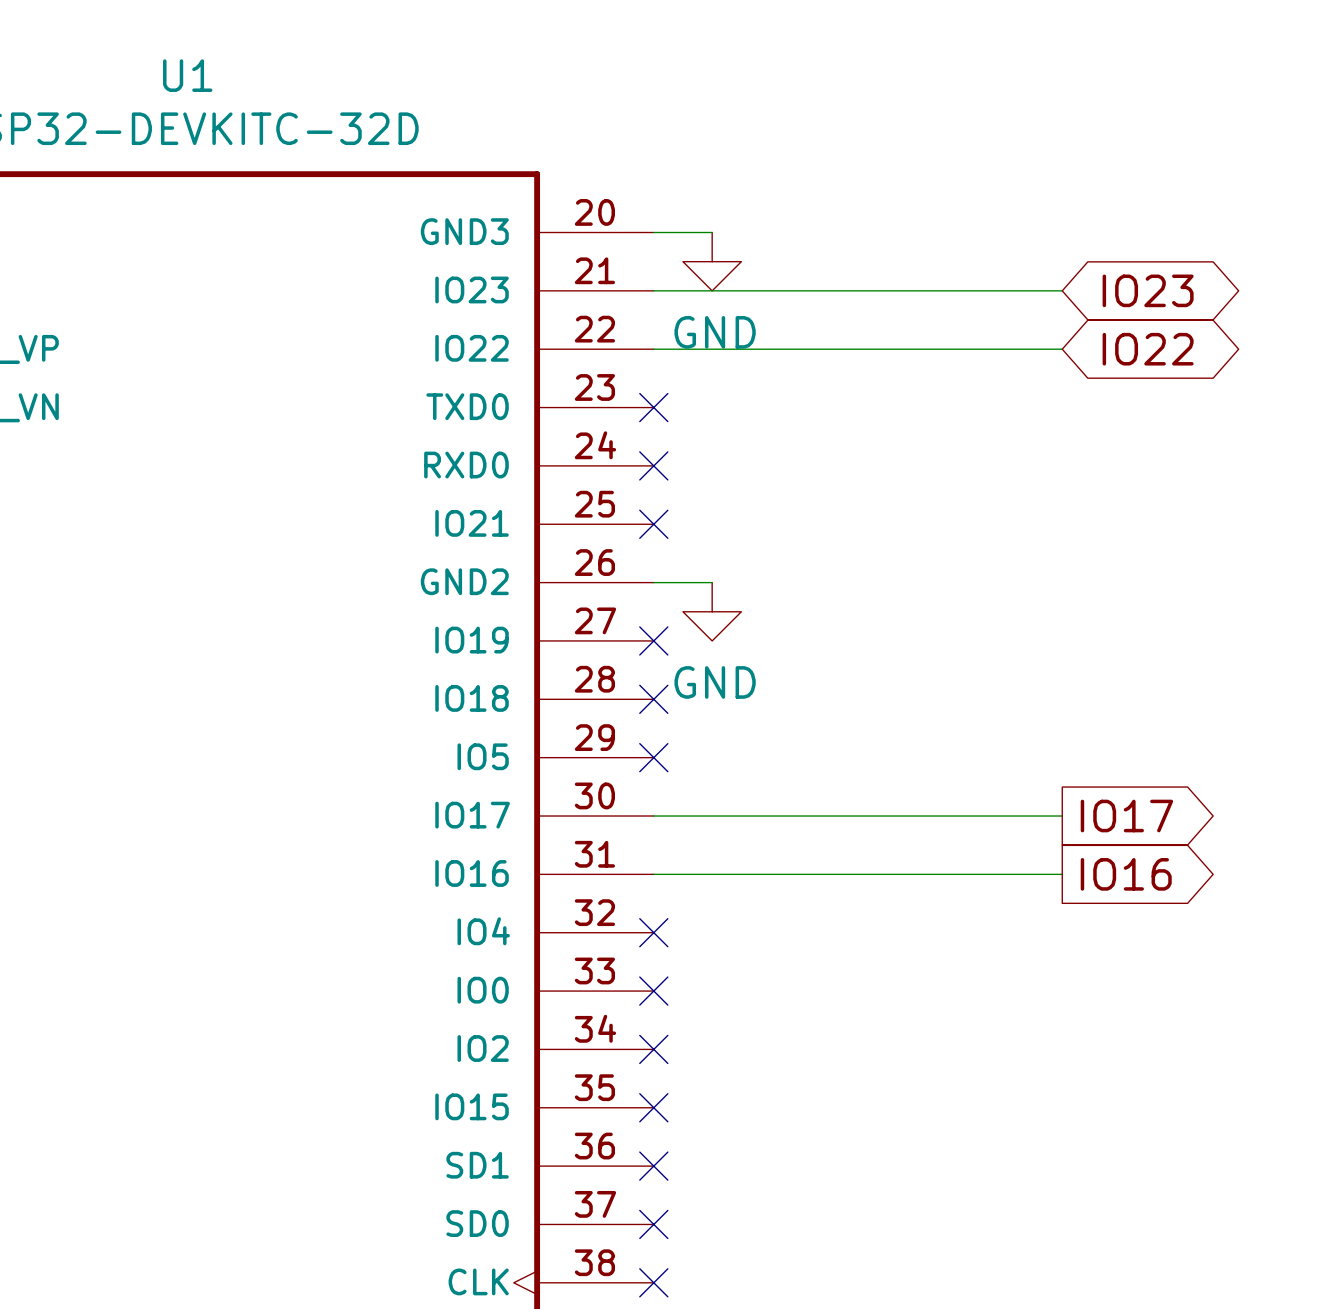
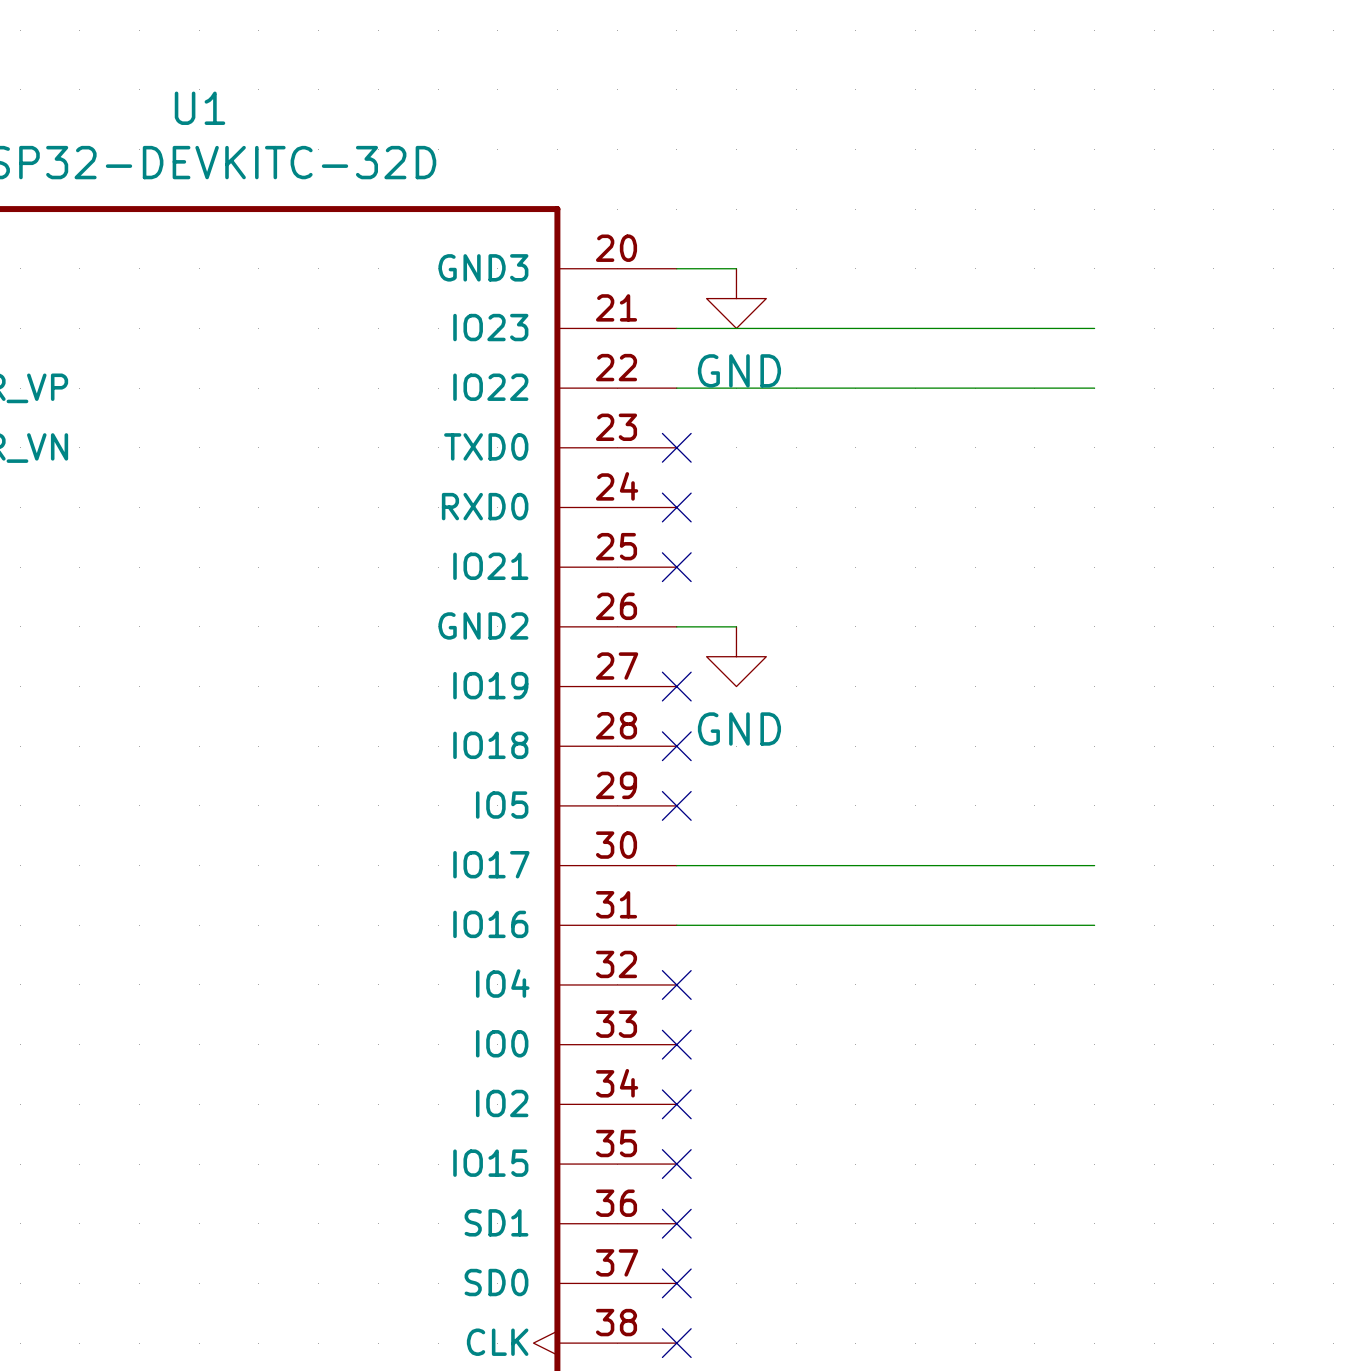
global label: IO23 (1148, 290) -> none
global label: IO22 (1148, 349) -> none
global label: IO17 (1126, 816) -> none
global label: IO16 (1126, 874) -> none

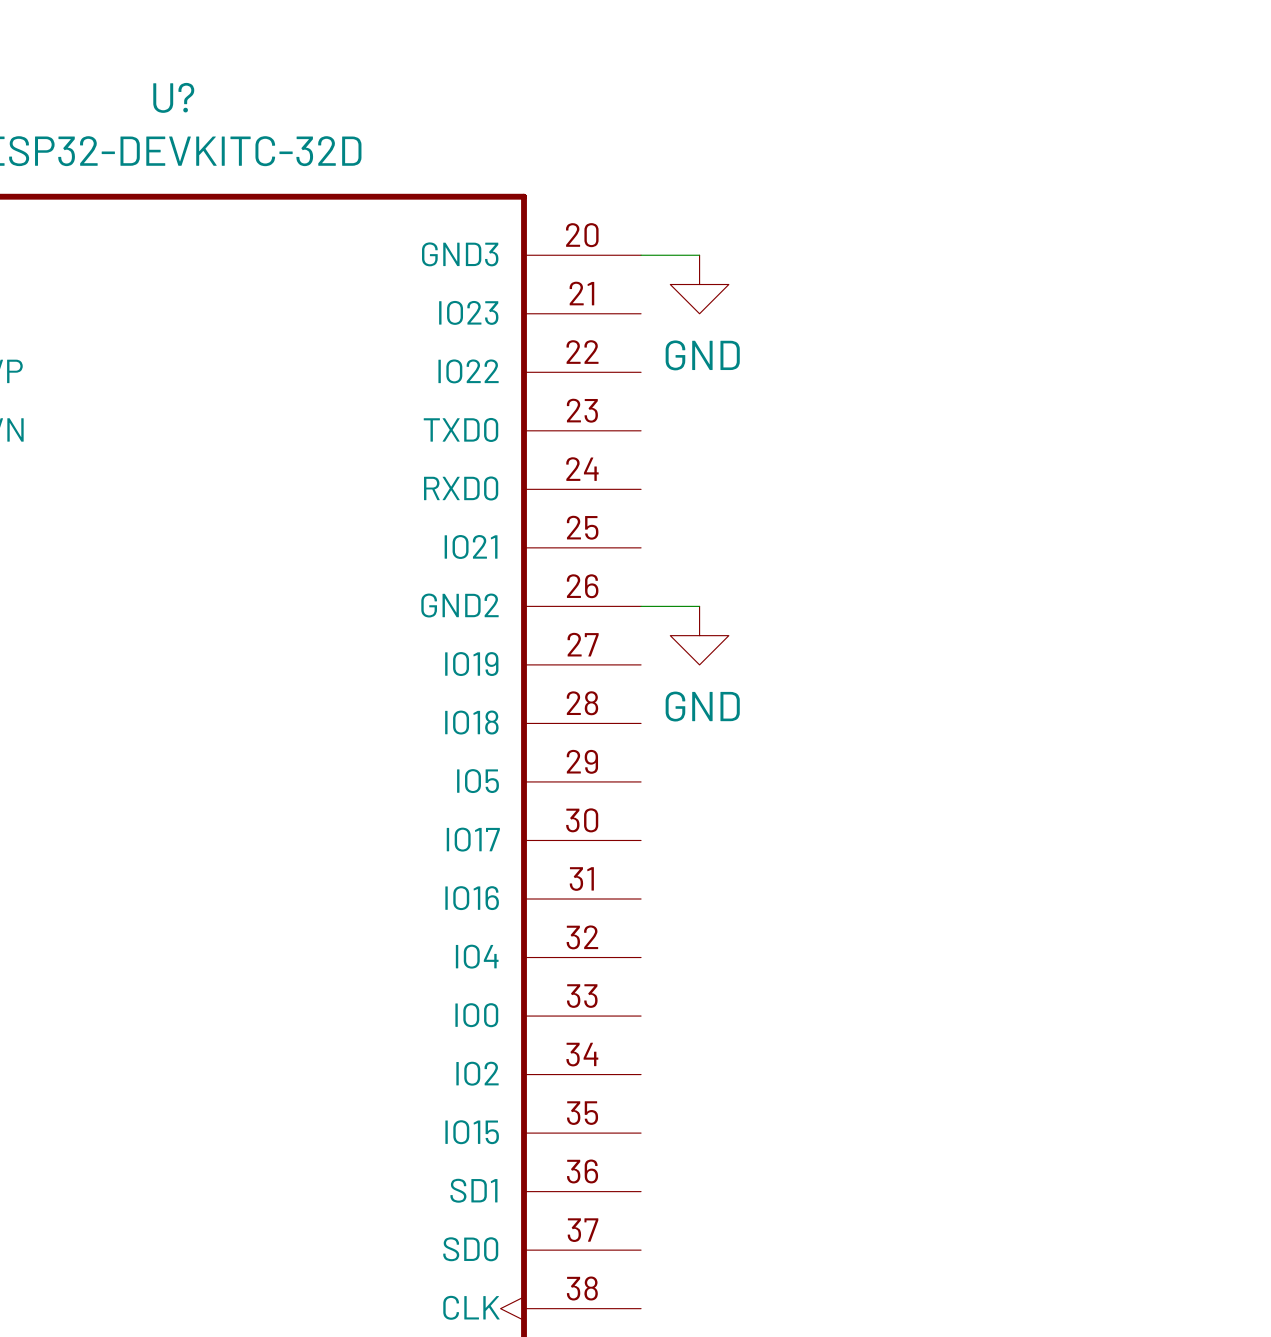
U1 name: U1 (199, 108) -> U? (173, 97)
wire: (676, 328) (1094, 328) -> none
wire: (676, 388) (1094, 388) -> none
no-connect mark: (676, 447) -> none
no-connect mark: (676, 507) -> none
no-connect mark: (676, 567) -> none
no-connect mark: (676, 686) -> none
no-connect mark: (676, 746) -> none
no-connect mark: (676, 805) -> none
wire: (676, 865) (1094, 865) -> none
wire: (676, 925) (1094, 925) -> none
no-connect mark: (676, 984) -> none
no-connect mark: (676, 1044) -> none
no-connect mark: (676, 1104) -> none
no-connect mark: (676, 1164) -> none
no-connect mark: (676, 1223) -> none
no-connect mark: (676, 1283) -> none
no-connect mark: (676, 1343) -> none

